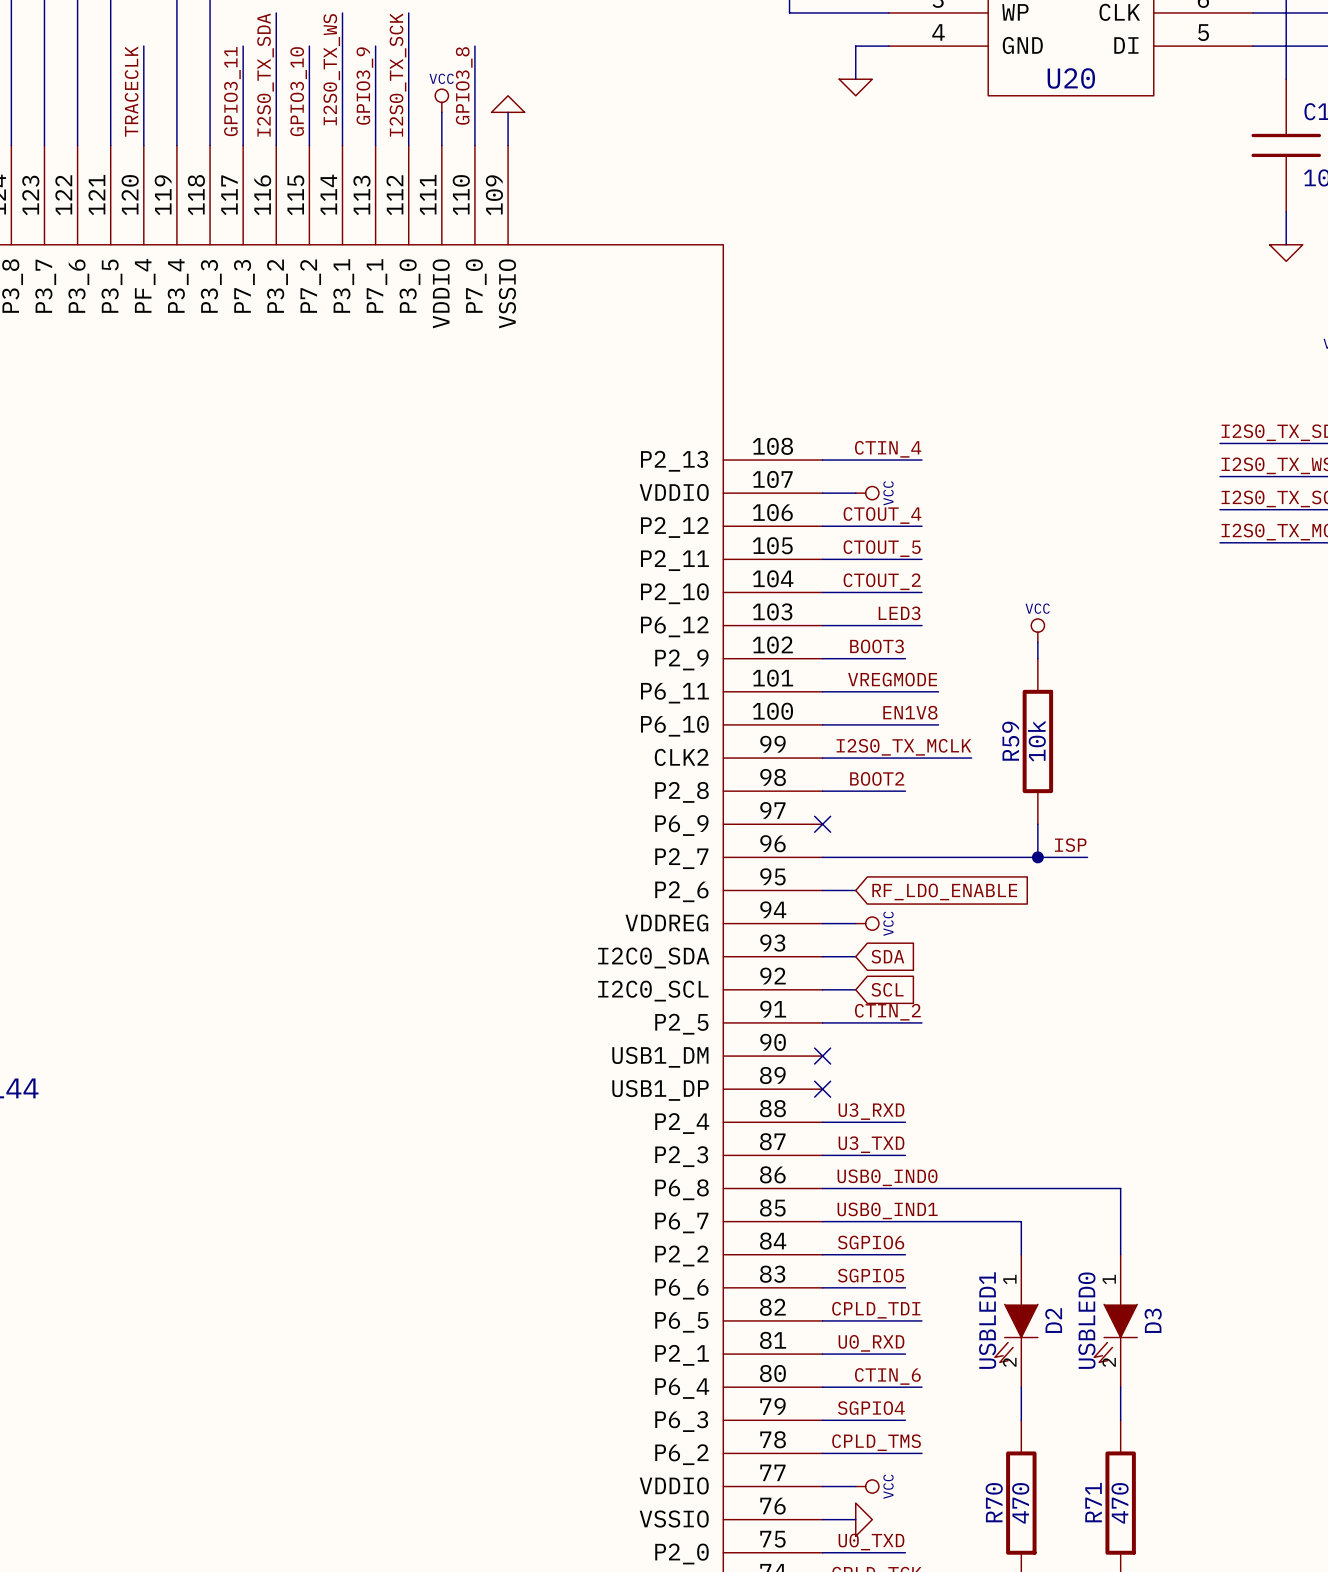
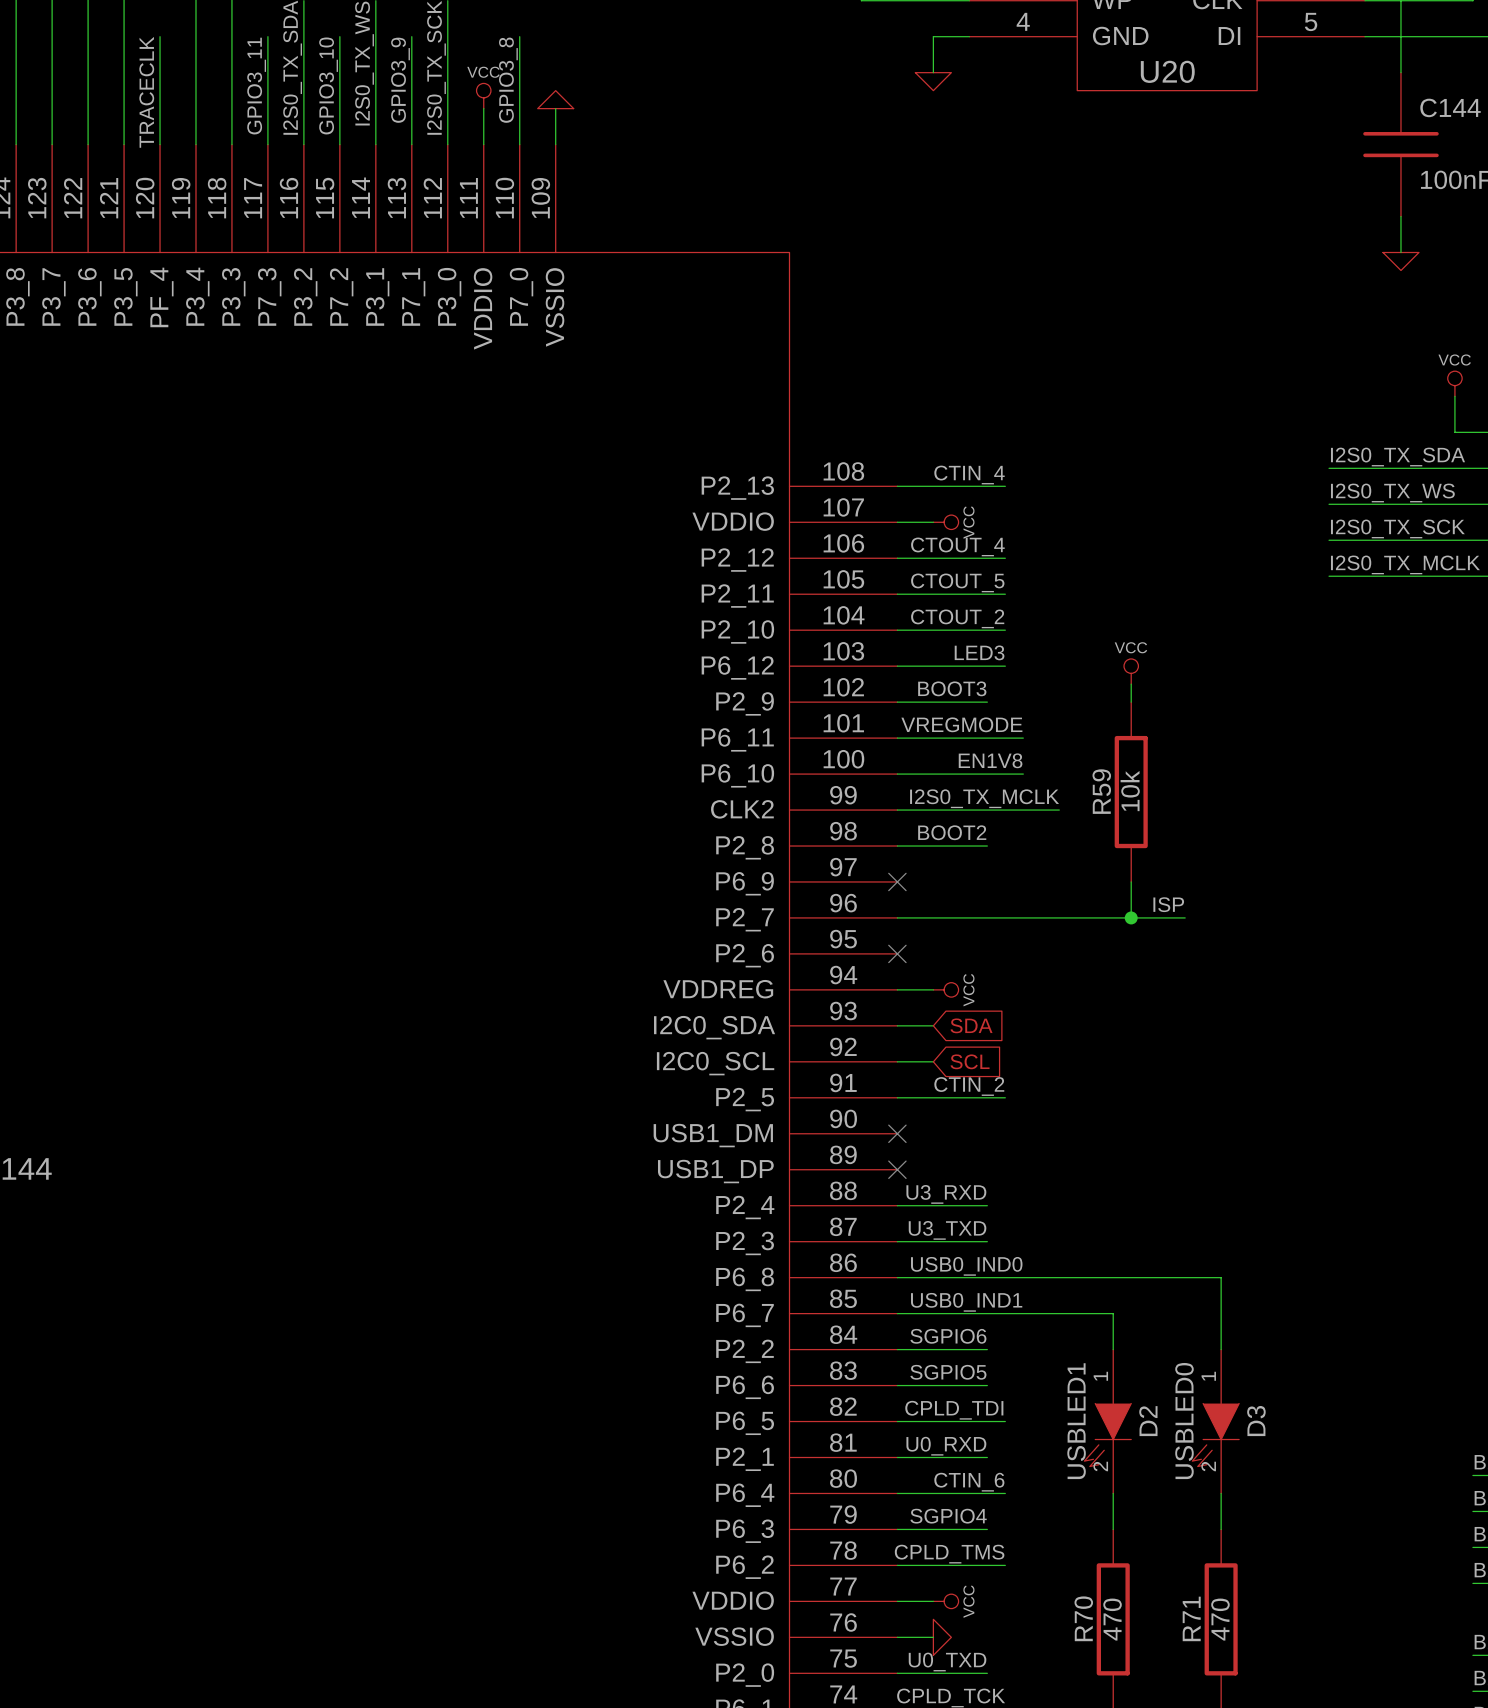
wire: (822, 890) (855, 890) -> none
no-connect mark: none -> (897, 953)
global label: RF_LDO_ENABLE (944, 891) -> none

